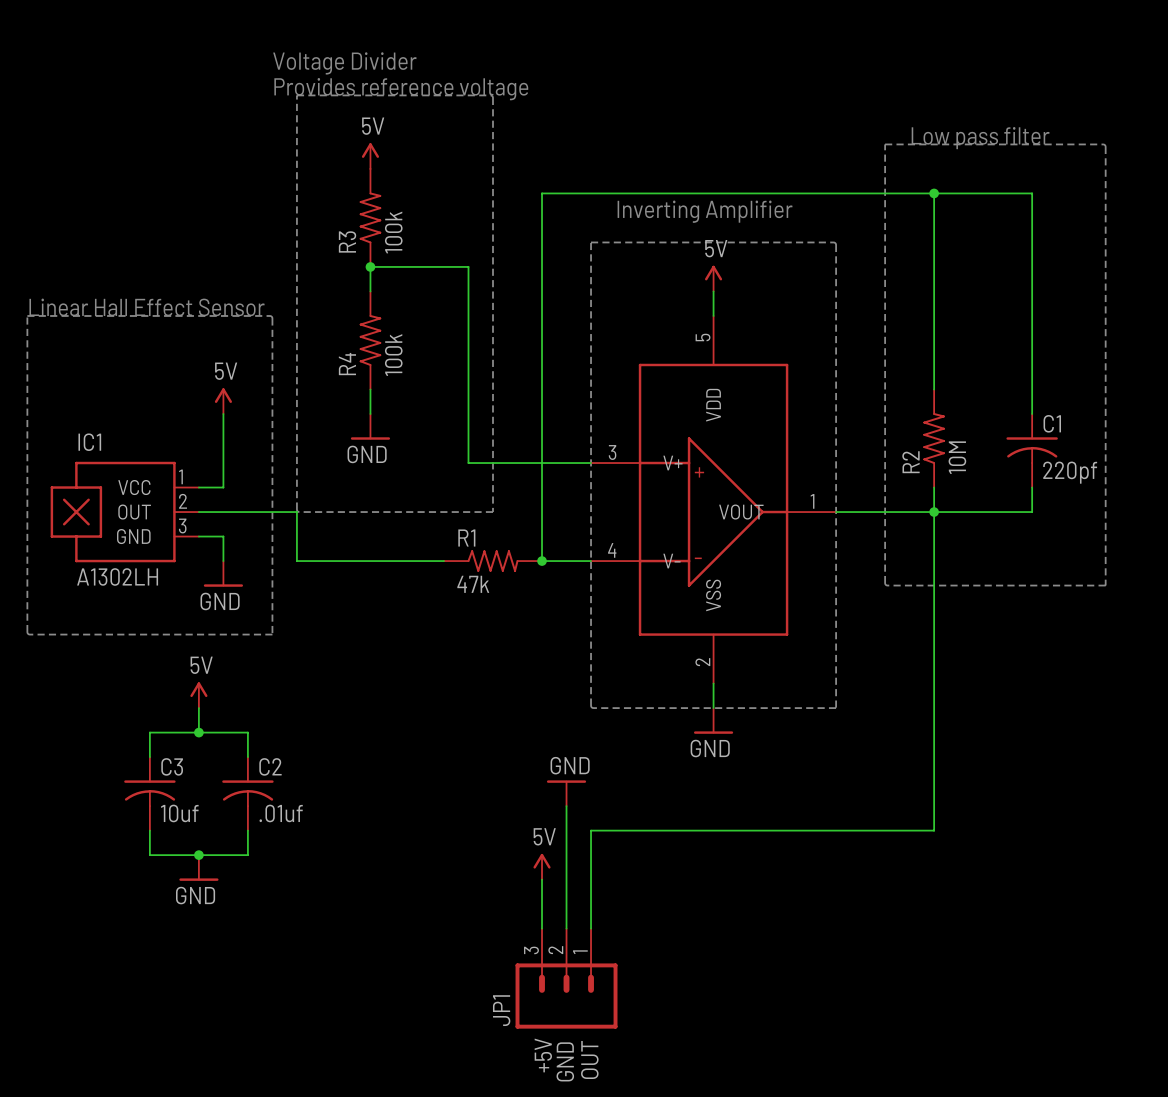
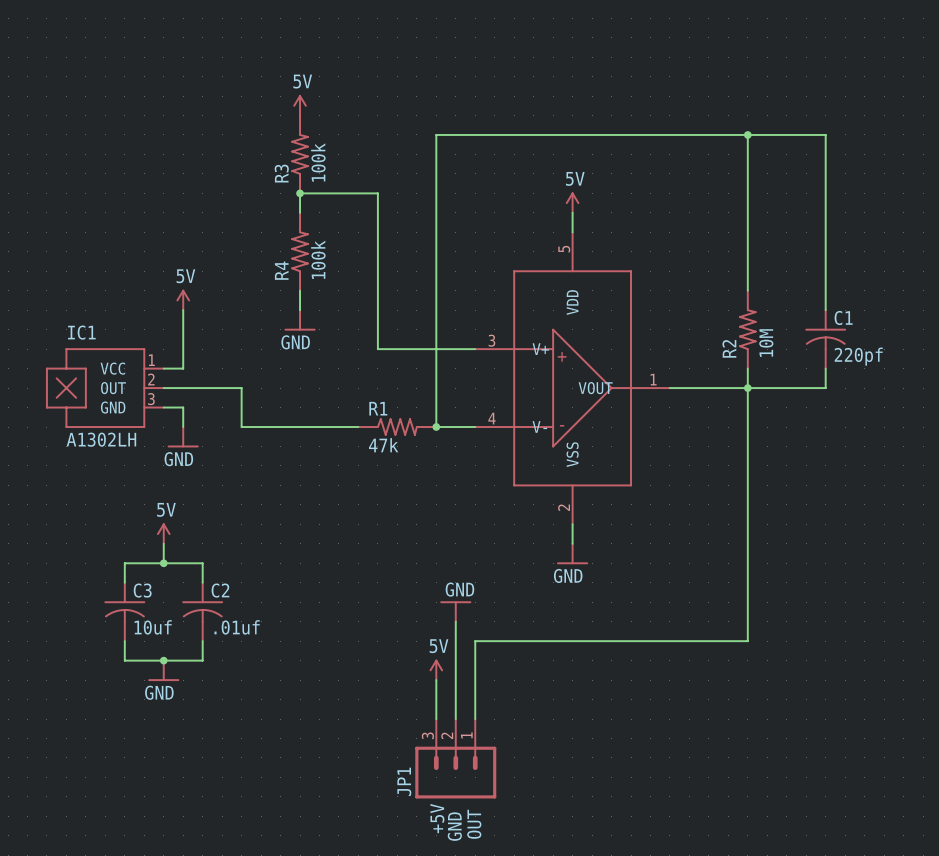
text: Voltage Divider (344, 63) -> none
text: Provides reference voltage (401, 89) -> none
line: (296, 95) (492, 96) (492, 512) (297, 510) (296, 95) -> none
text: Low pass filter (980, 138) -> none
line: (885, 144) (1105, 145) (1105, 585) (885, 584) (885, 144) -> none
text: Inverting Amplifier (705, 211) -> none
line: (591, 242) (835, 243) (836, 708) (591, 706) (591, 242) -> none
text: Linear Hall Effect Sensor (147, 307) -> none
line: (27, 315) (271, 316) (272, 634) (27, 633) (27, 315) -> none

